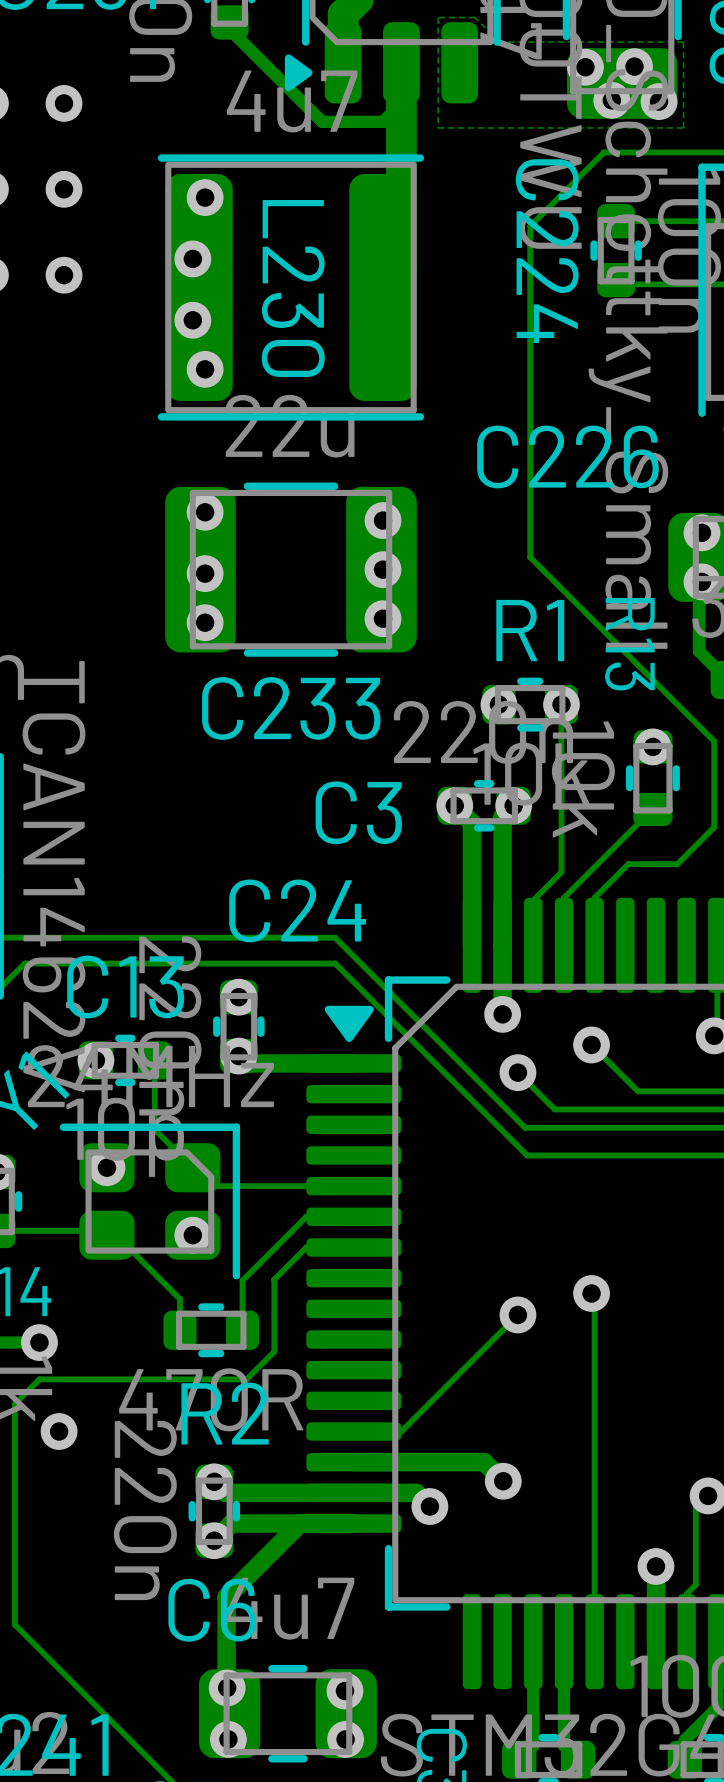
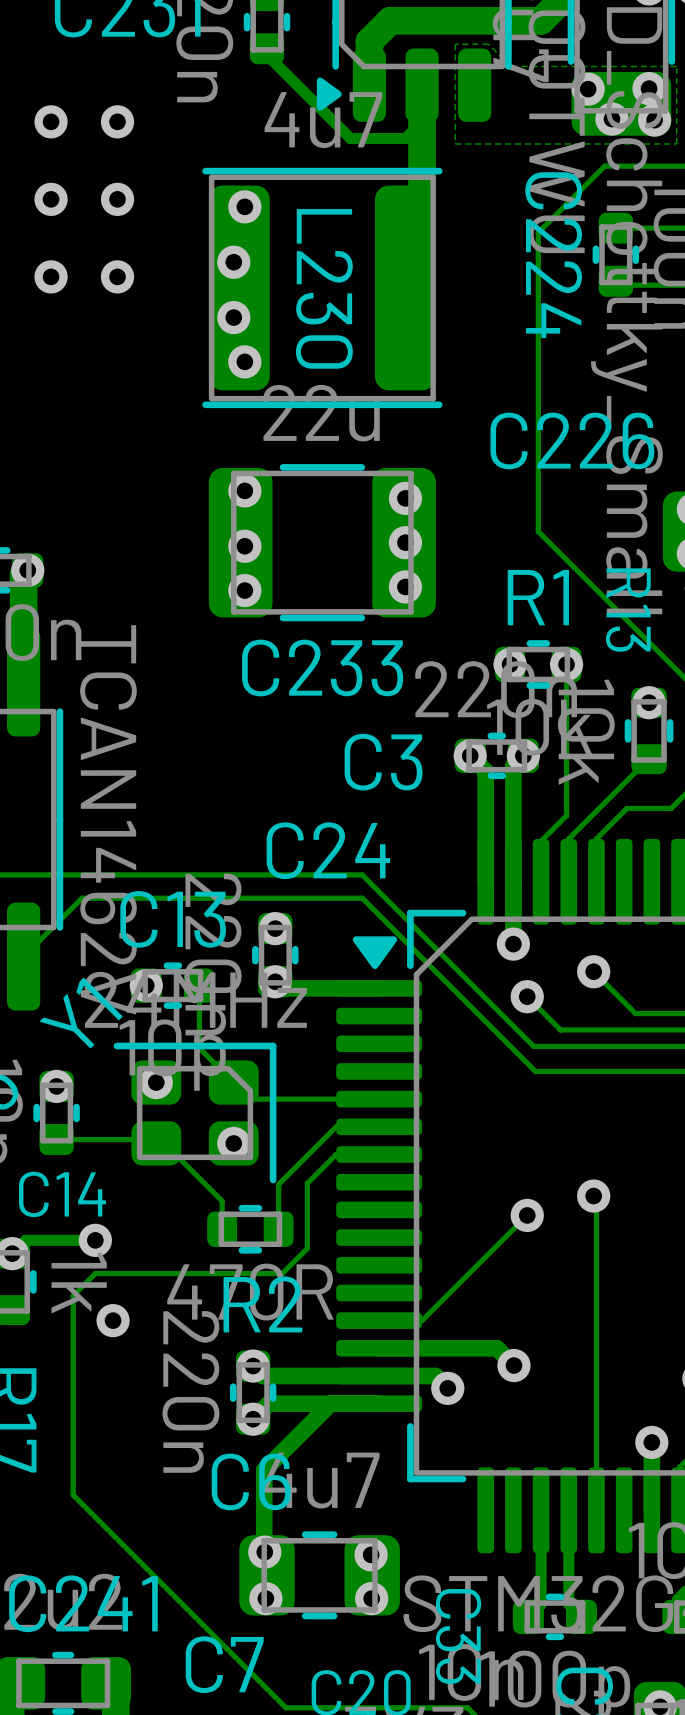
via position: (634, 66) -> (649, 88)

